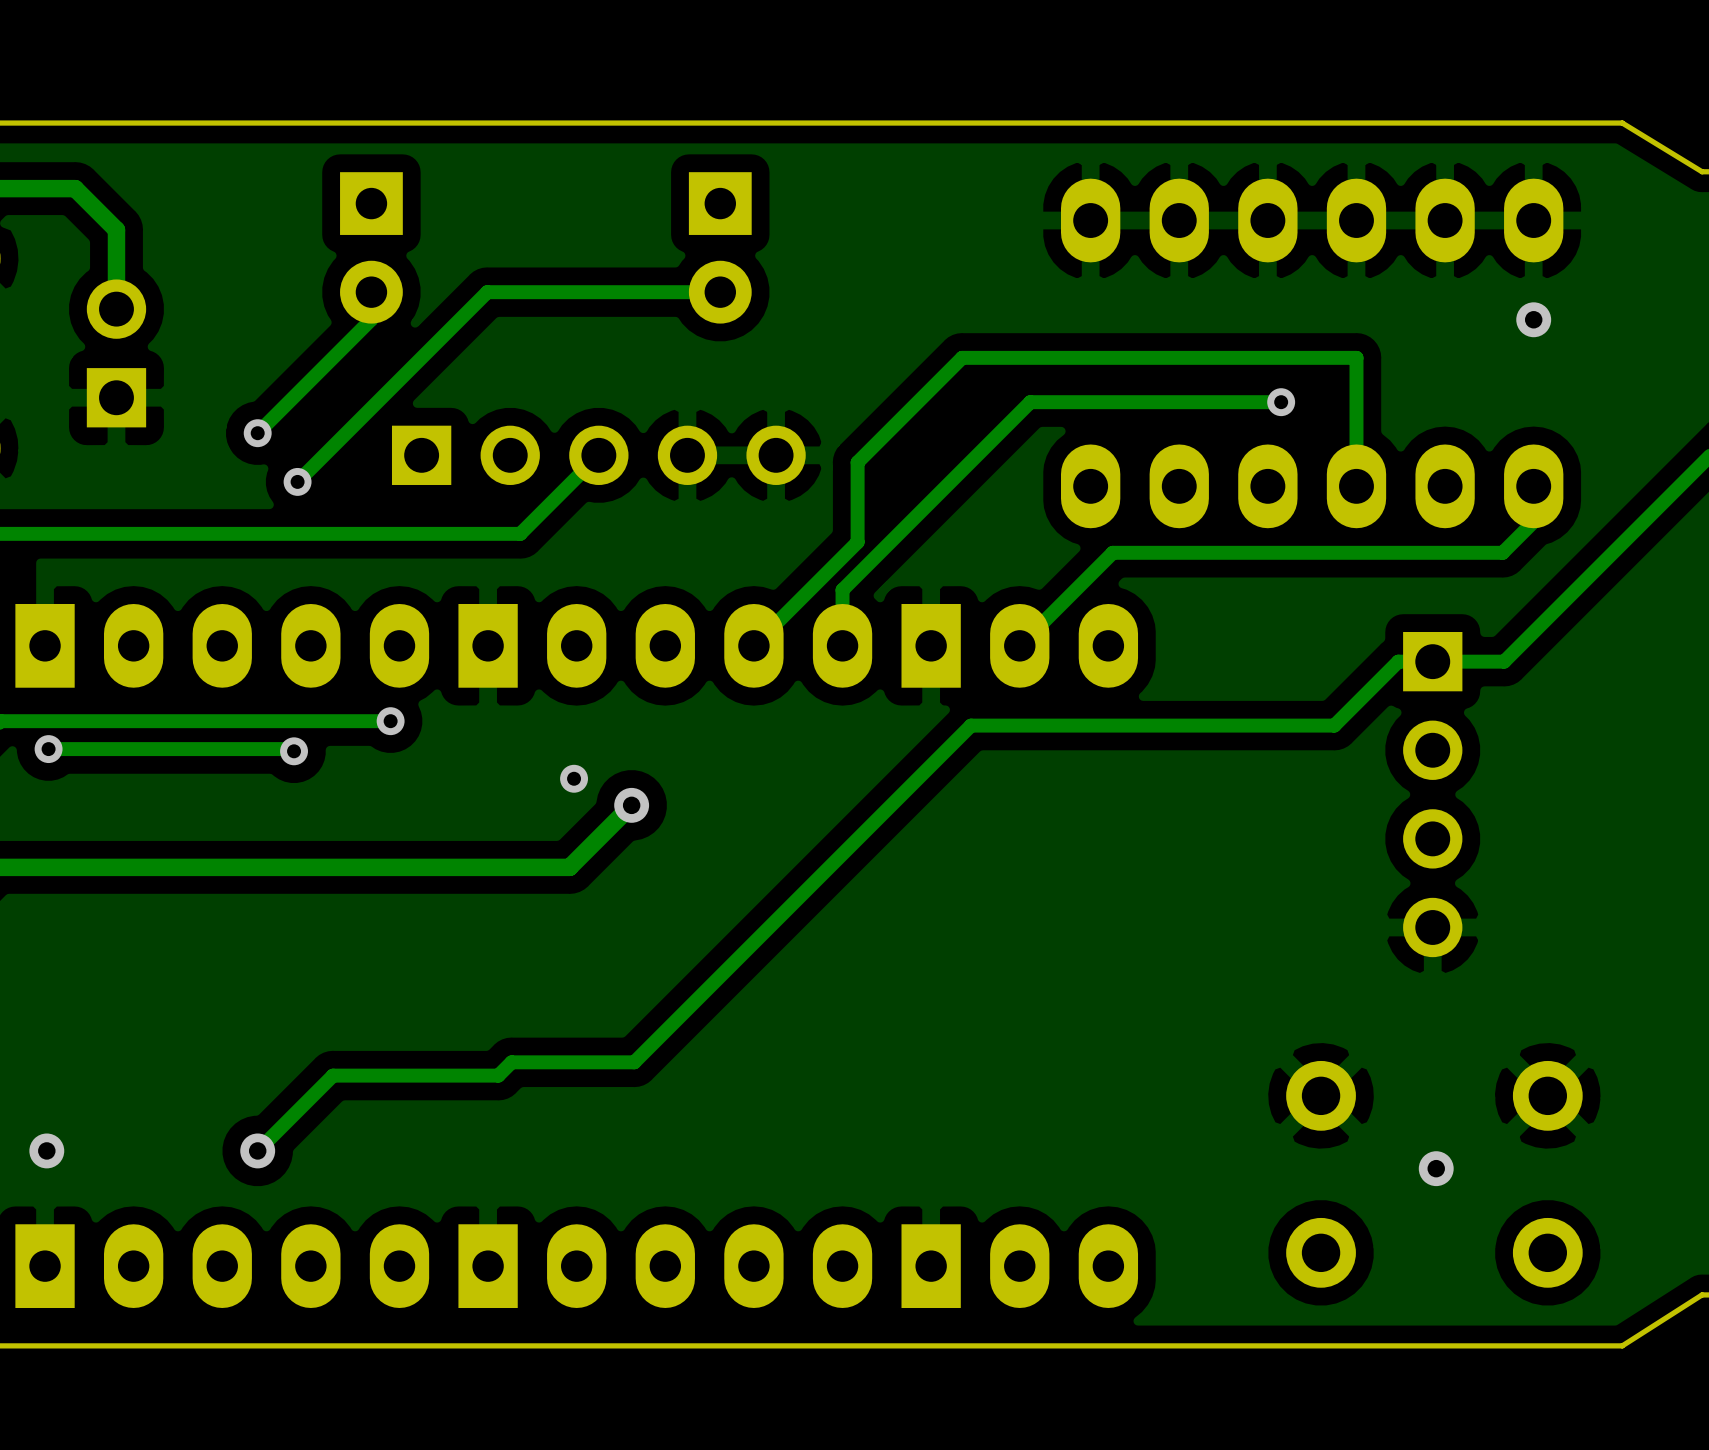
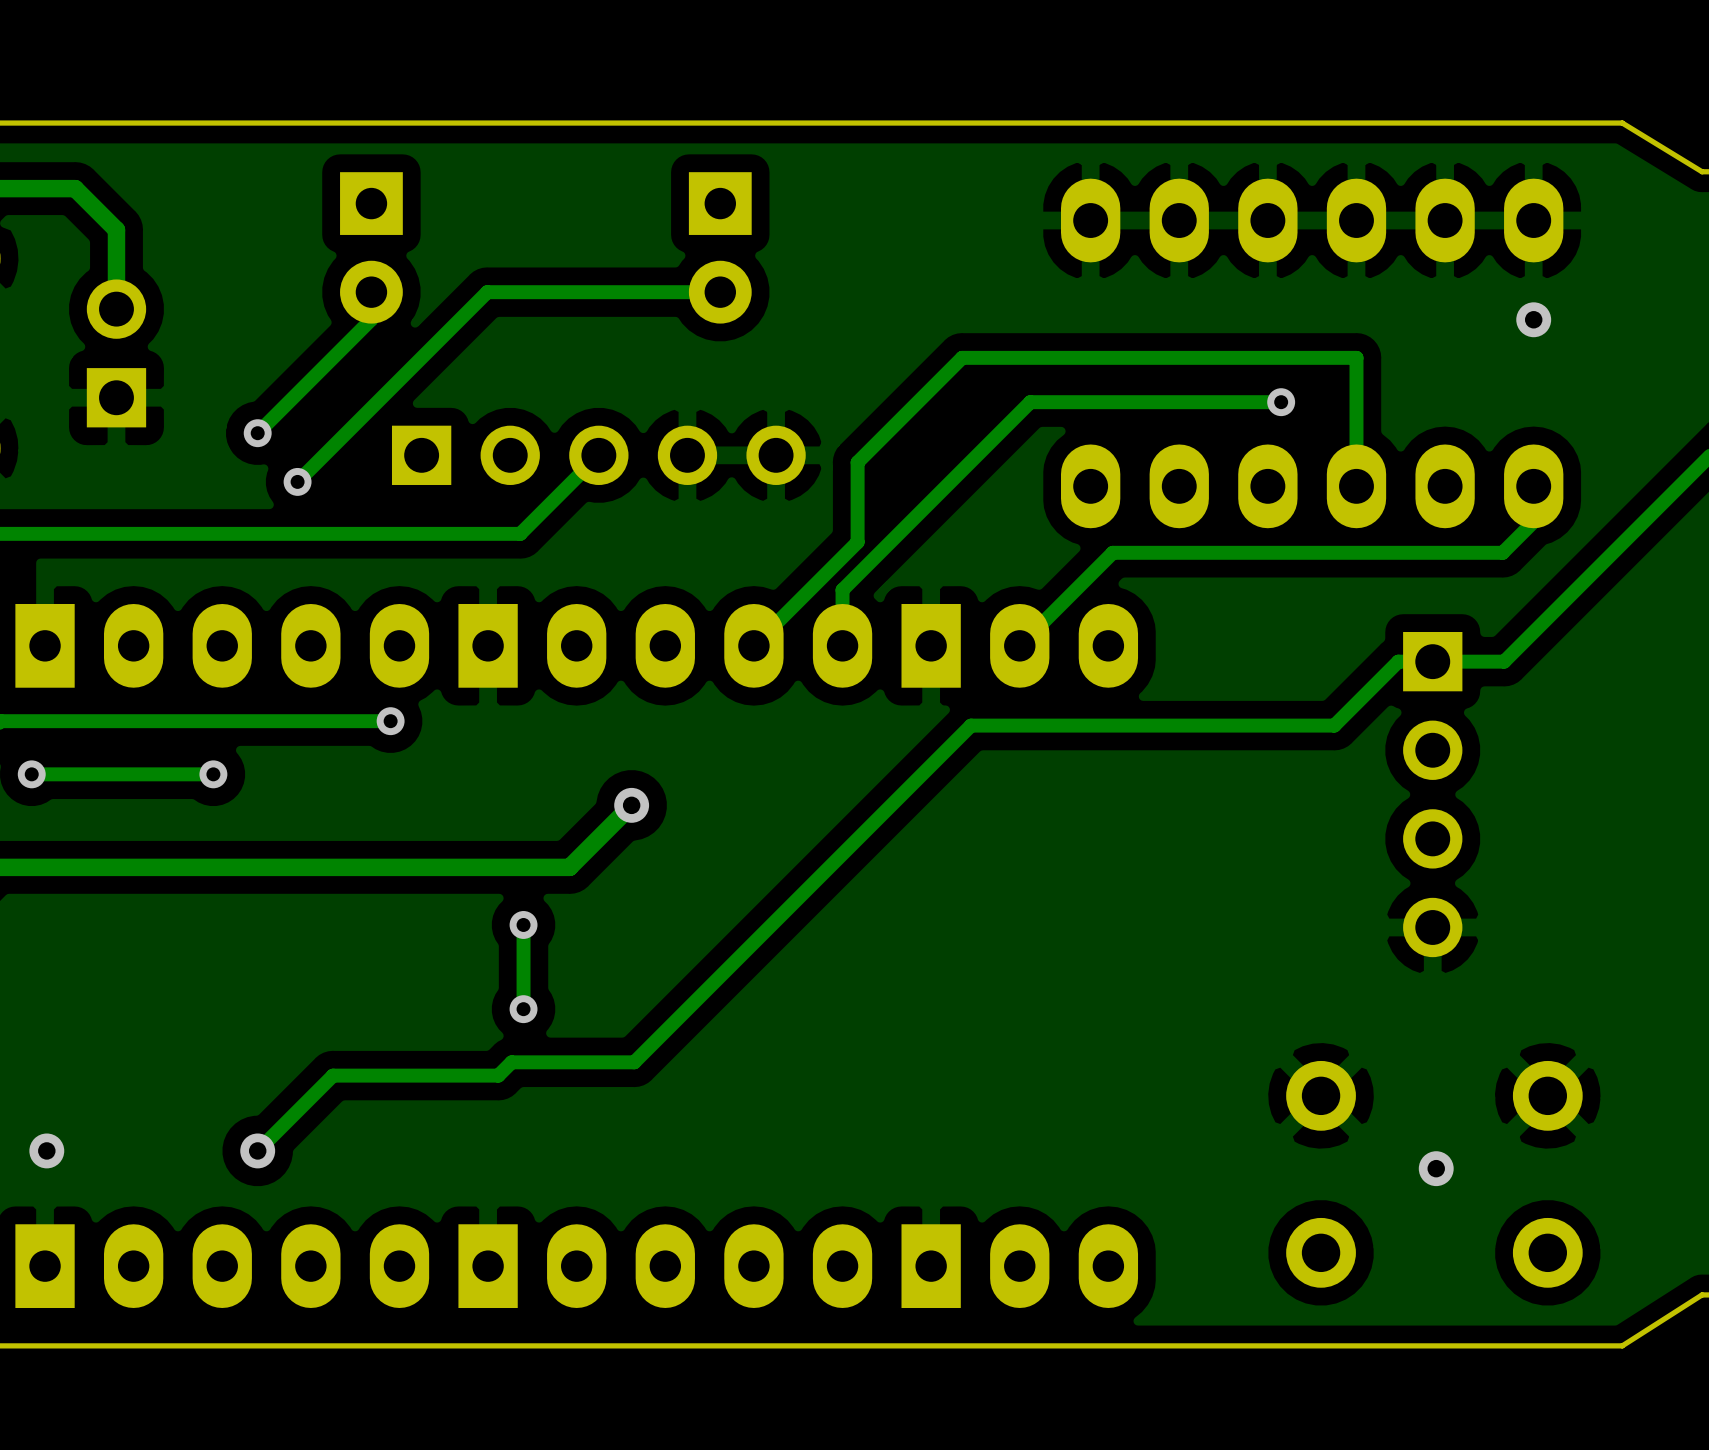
track: (48, 749) (291, 749) (294, 751) -> none
via position: (48, 749) -> (31, 774)
via: (294, 751) -> none
track: none -> (213, 774) (31, 774)
via: none -> (213, 774)
via: (574, 778) -> none
track: none -> (523, 924) (523, 1009)
via: none -> (523, 924)
via: none -> (523, 1009)

